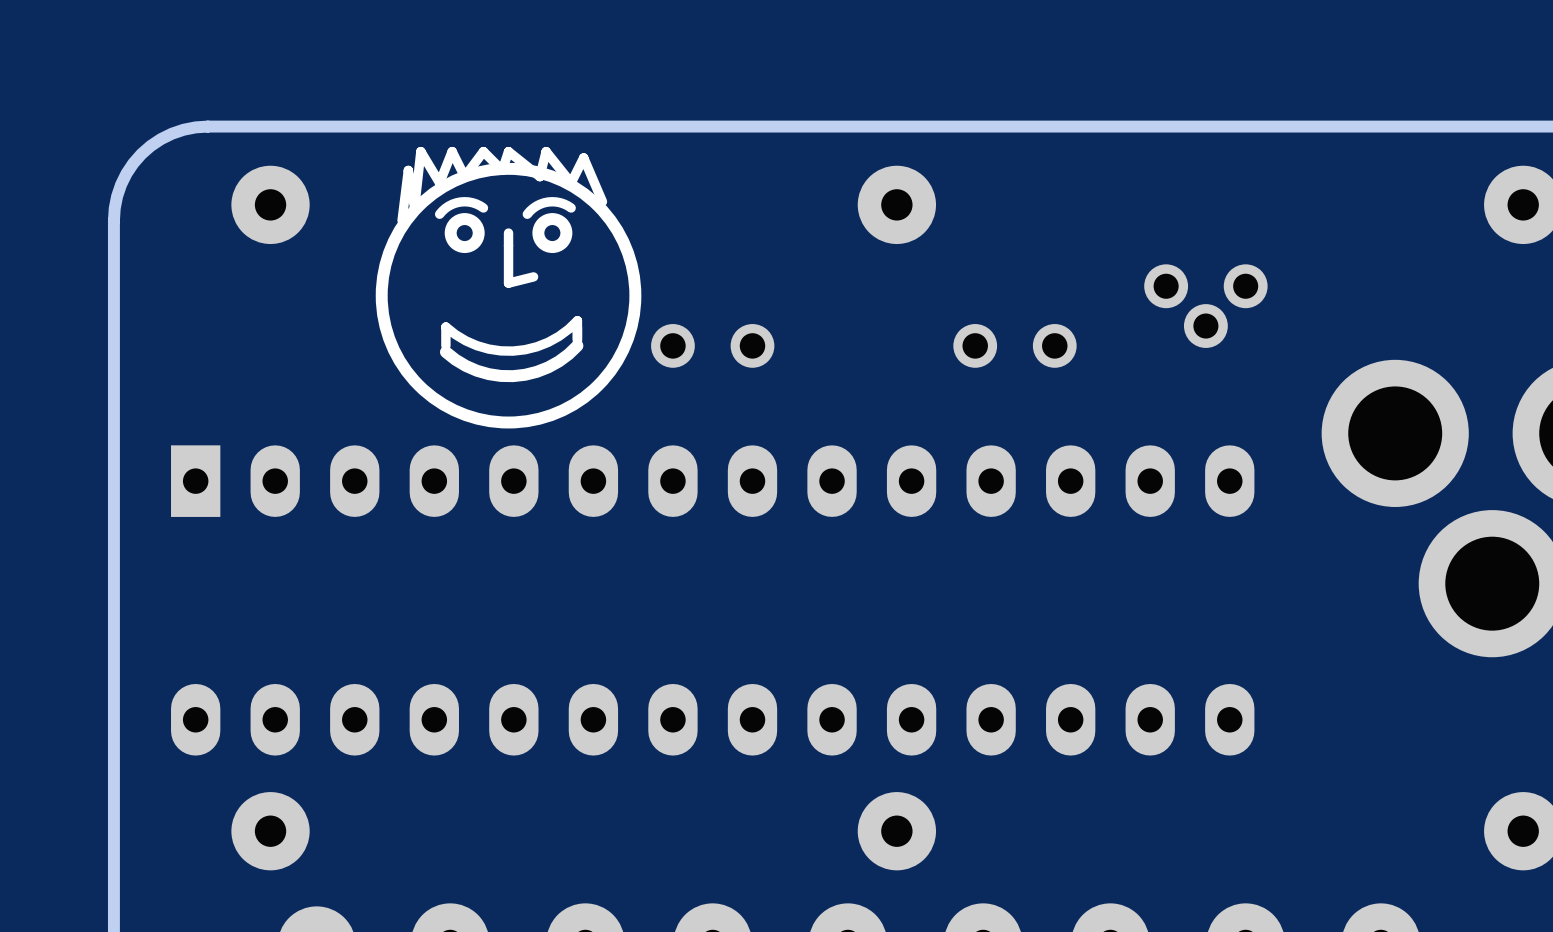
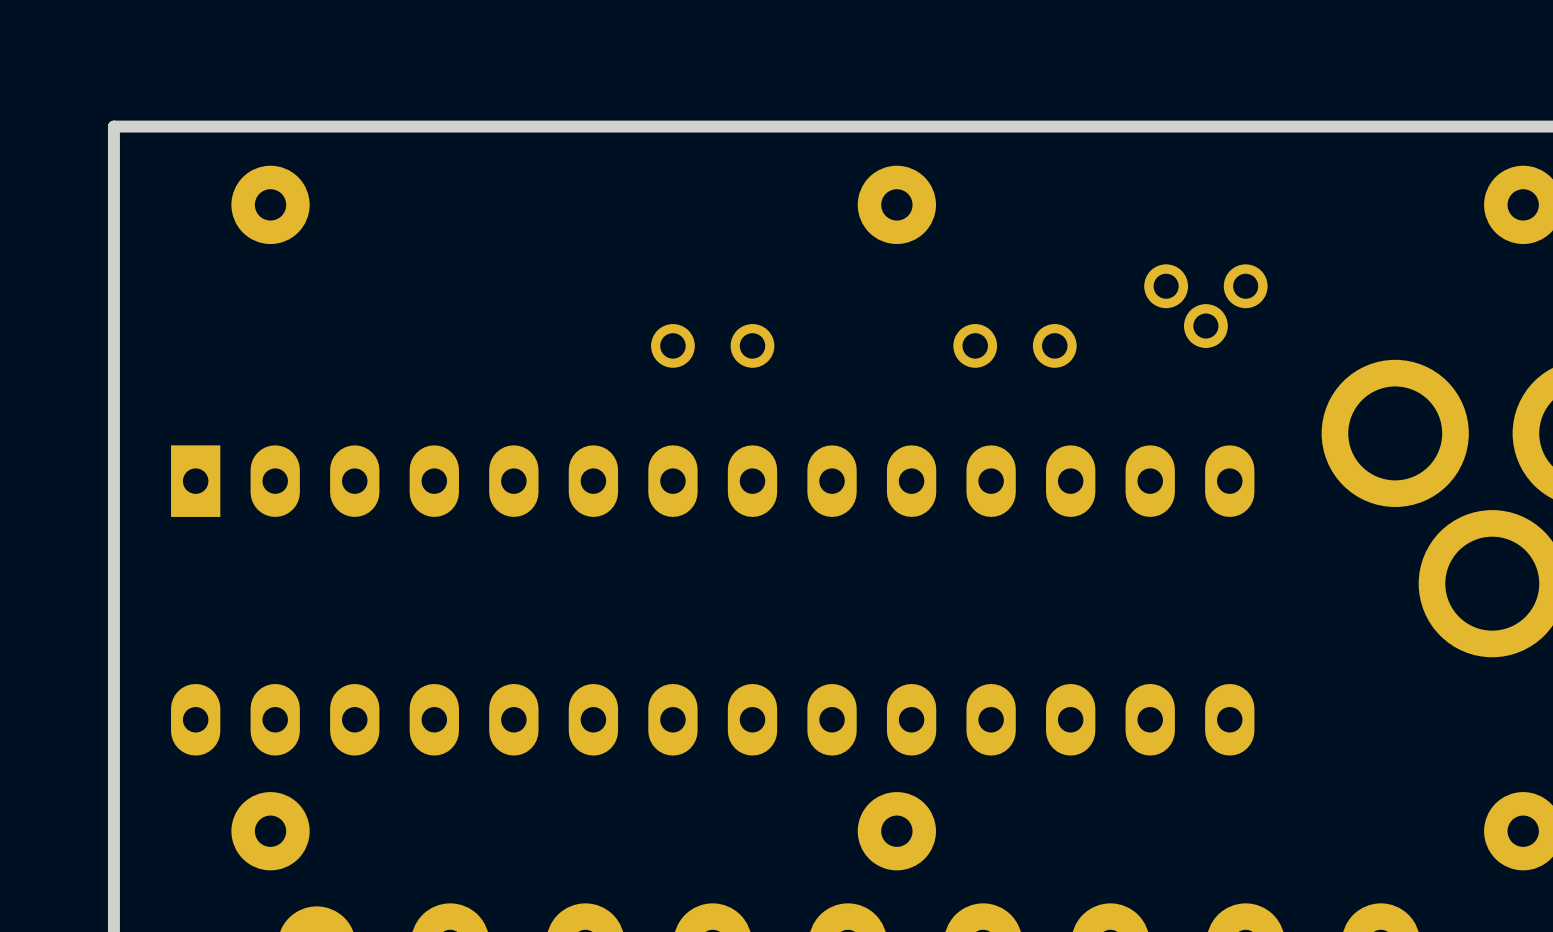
board edge: (207, 126) (183, 129) (171, 133) (160, 139) (141, 154) (126, 173) (121, 184) (114, 208) (113, 220) -> (207, 126) (113, 126) (113, 220)
drawing: [375, 162, 642, 429] -> none
line: (602, 201) (583, 157) (571, 182) (546, 151) (539, 176) (508, 151) (502, 170) (483, 151) (464, 176) (452, 151) (439, 182) (420, 151) (414, 207) (408, 170) (402, 220) -> none
line: (483, 207) (472, 202) (460, 202) (448, 206) (439, 214) -> none
line: (571, 207) (560, 202) (547, 202) (536, 206) (527, 214) -> none
line: (508, 233) (508, 283) (533, 276) -> none
line: (445, 345) (445, 326) (465, 340) (477, 345) (500, 350) (525, 349) (548, 342) (558, 336) (577, 320) (577, 345) (558, 361) (548, 367) (525, 374) (500, 375) (477, 370) (465, 365) (445, 352) -> none

